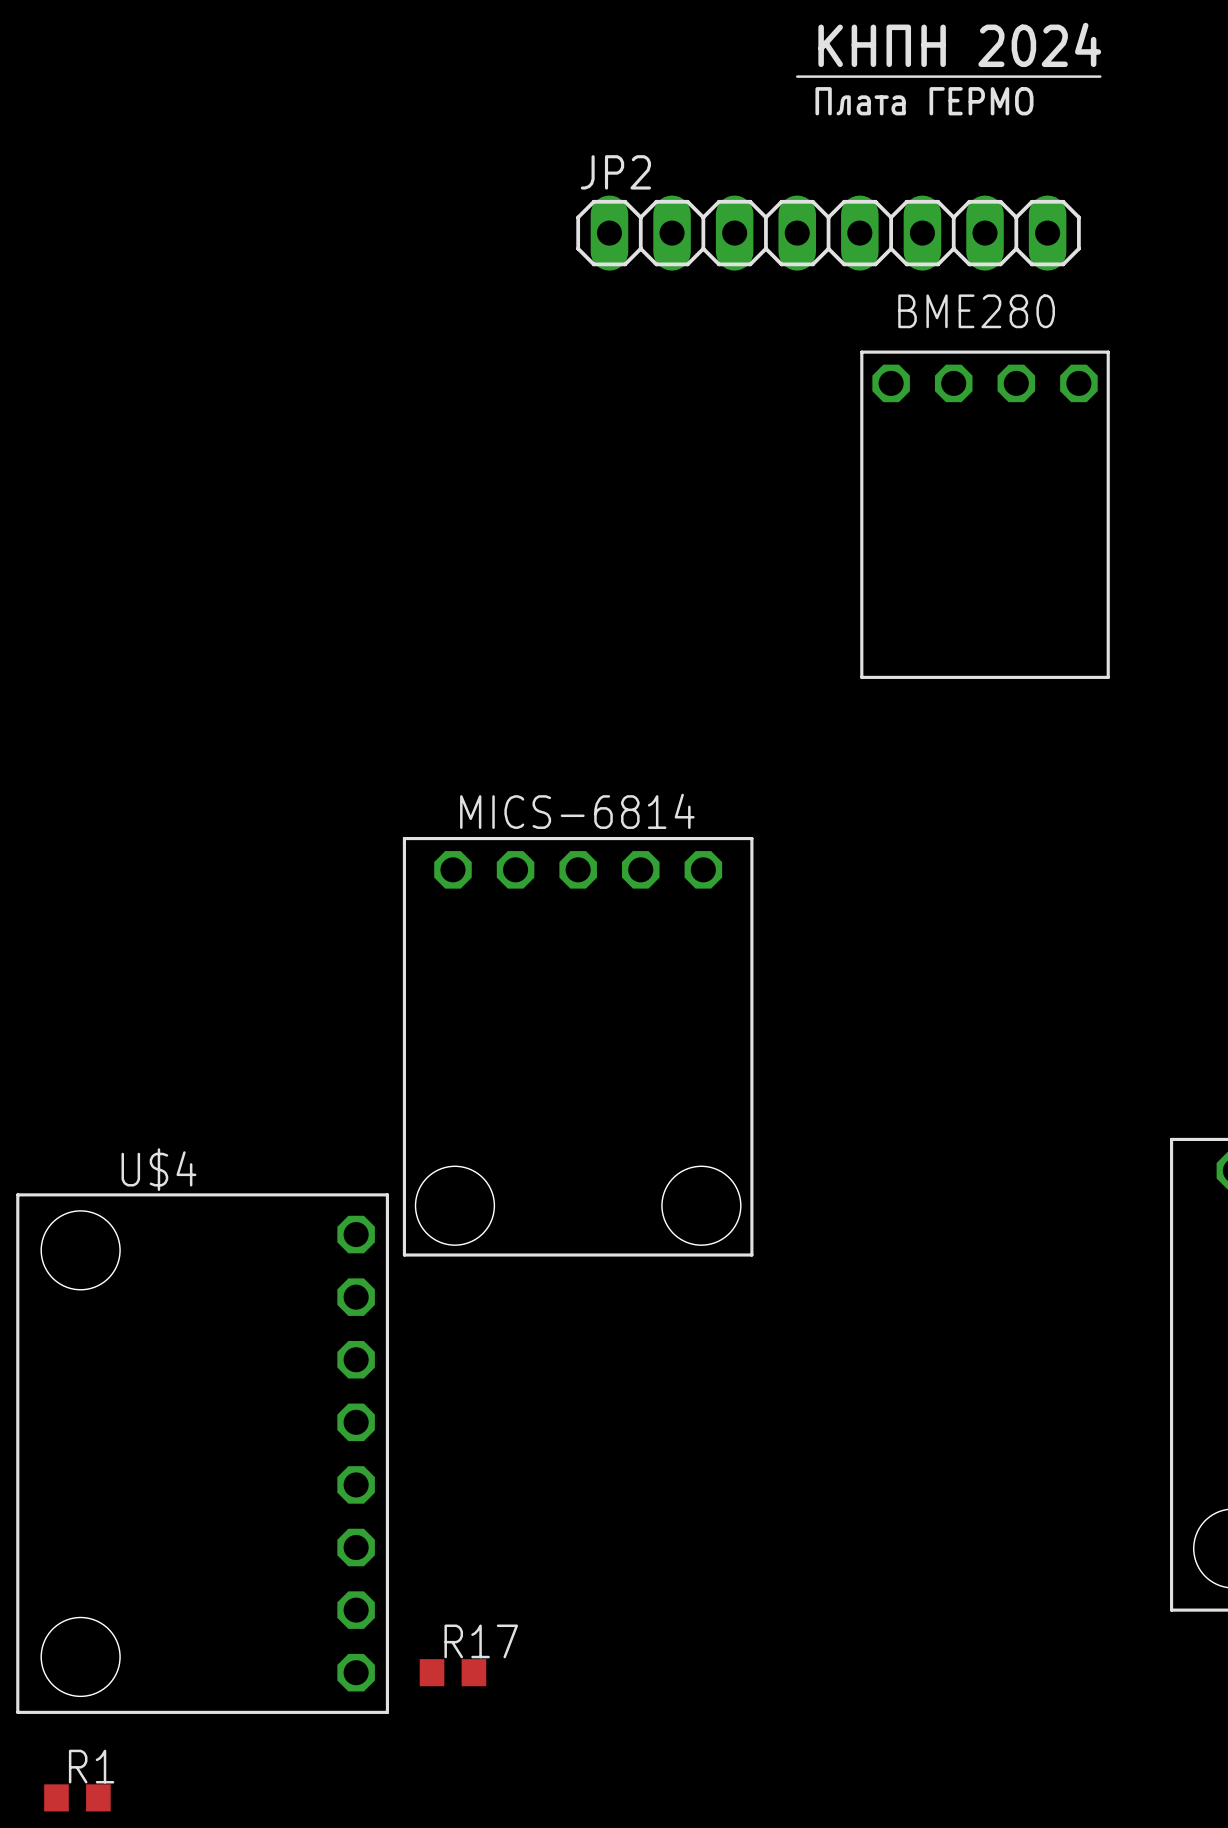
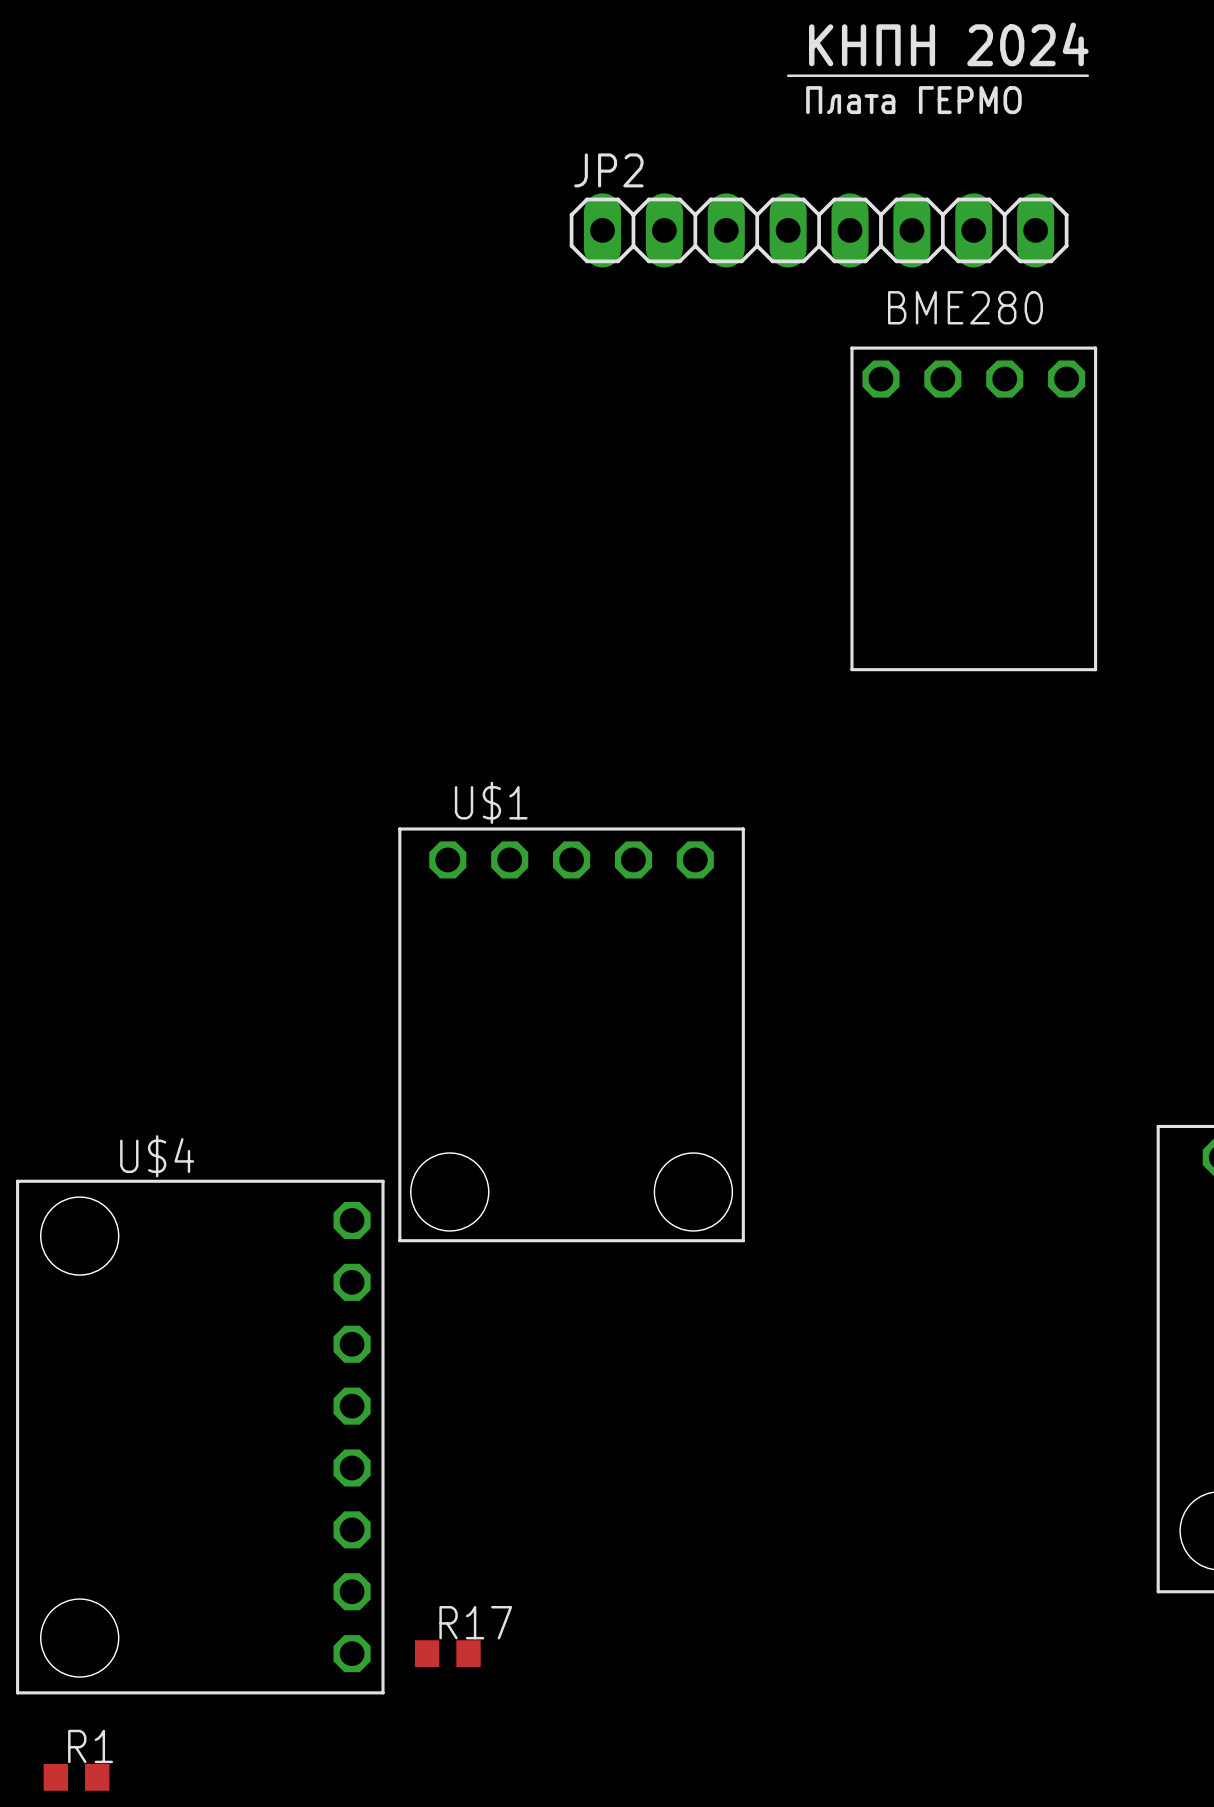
MICS-6814 name: MICS-6814 (577, 811) -> U$1 (491, 802)

